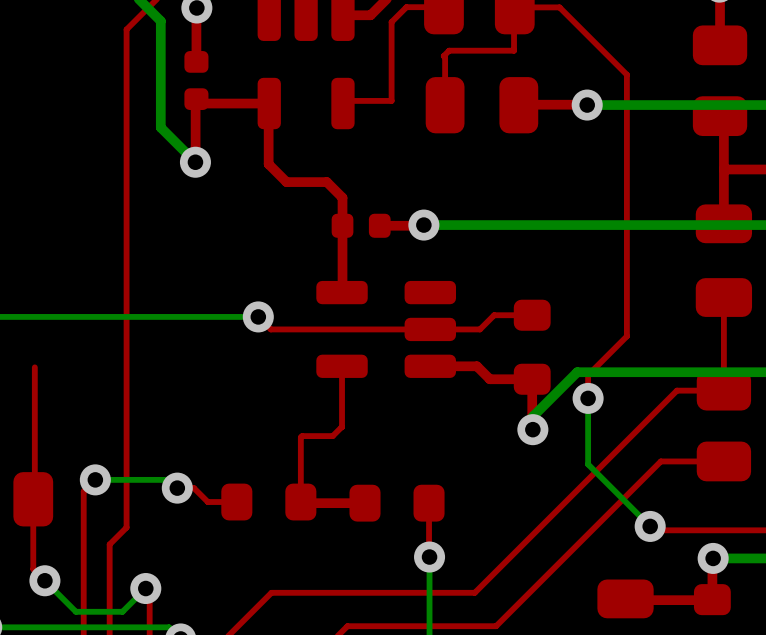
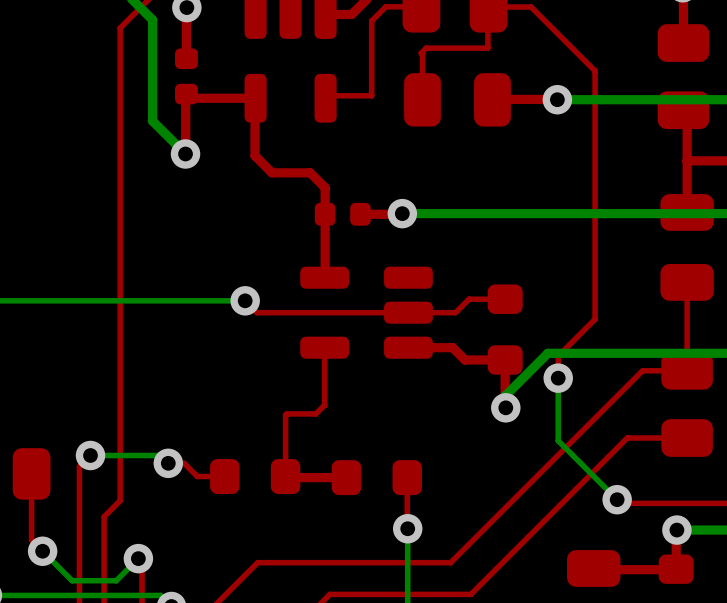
top track: (34, 367) (34, 497) (33, 499) -> none

